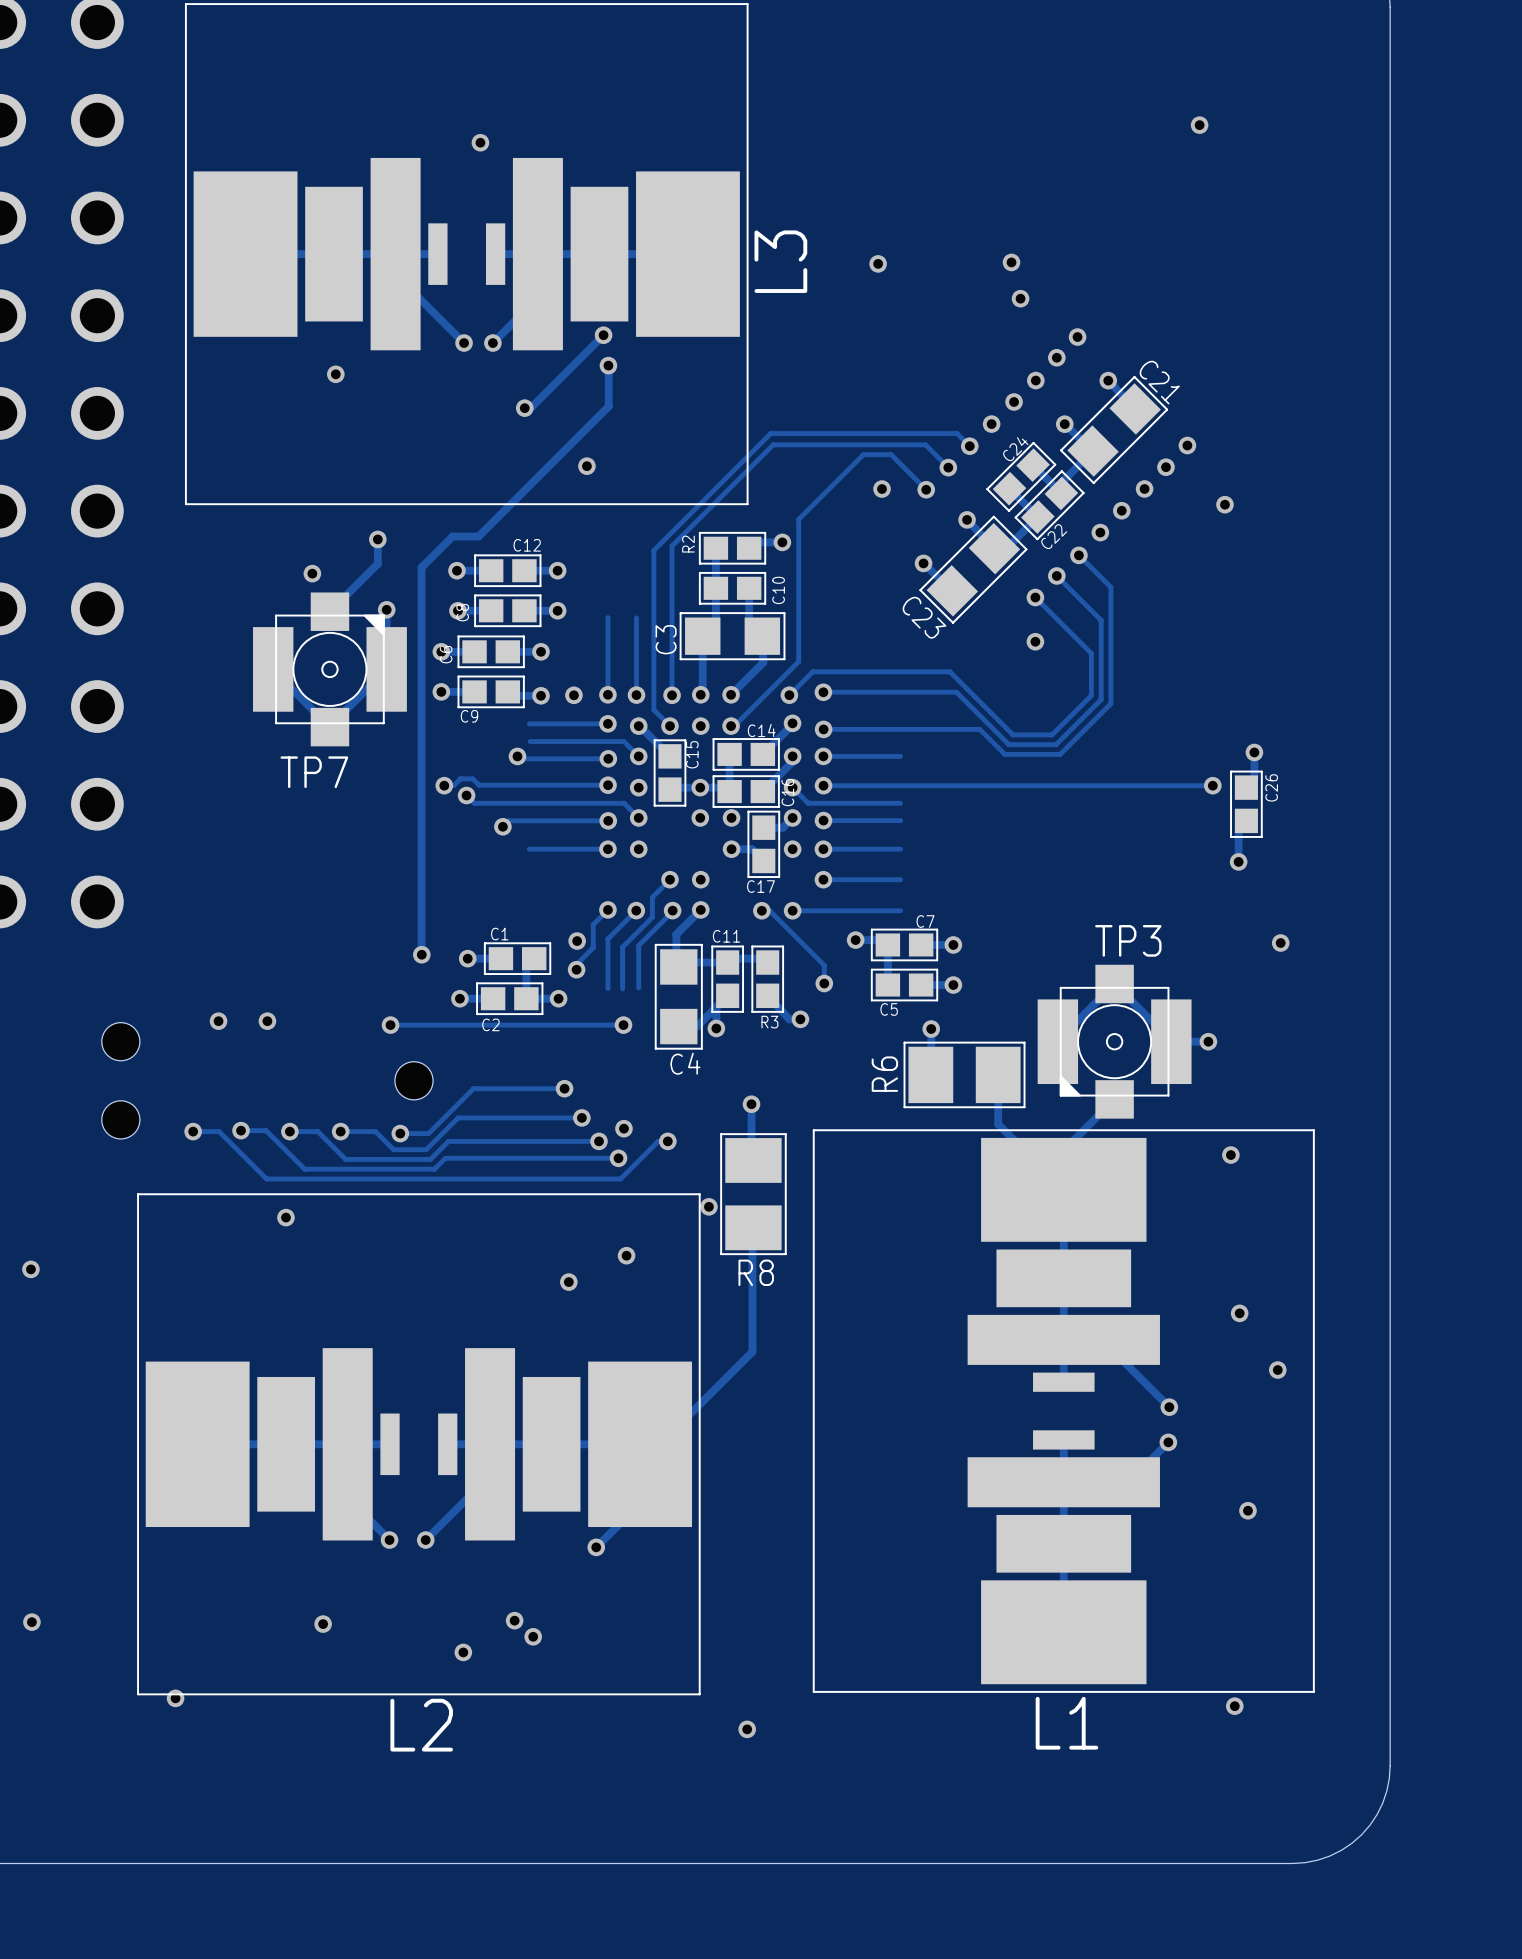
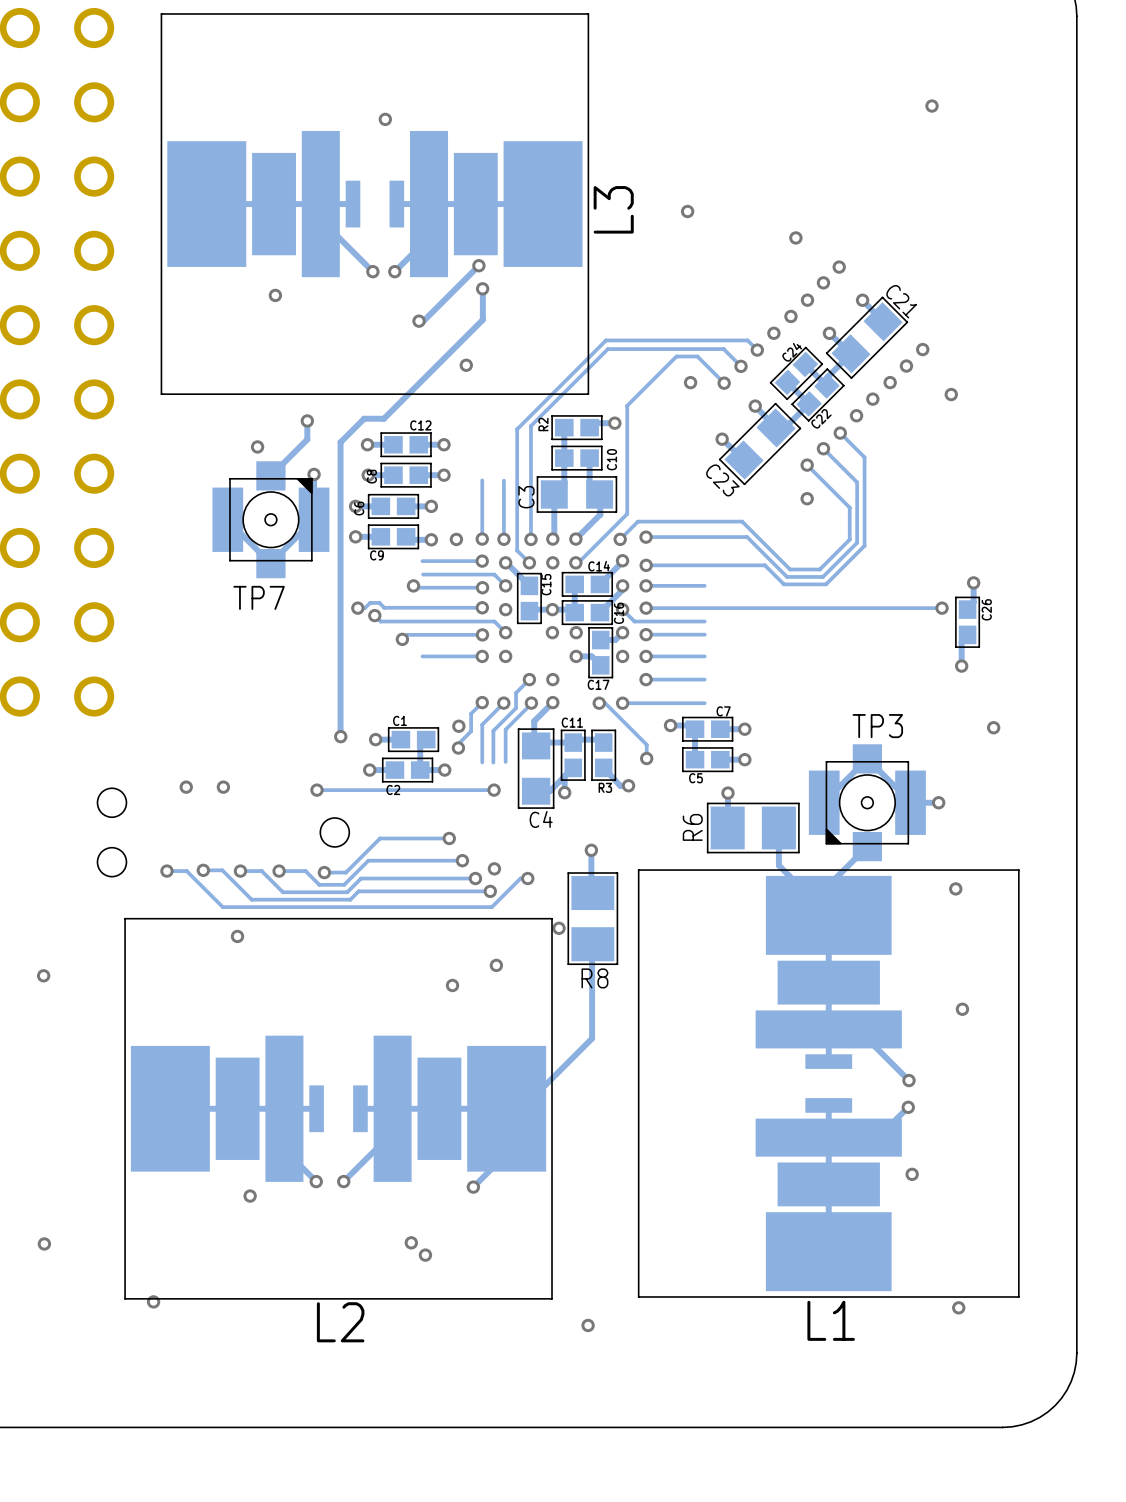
via: (1011, 262) -> none
via: (1277, 1370) -> none
via position: (1247, 1510) -> (912, 1174)
via position: (323, 1624) -> (250, 1196)
via: (463, 1652) -> none

